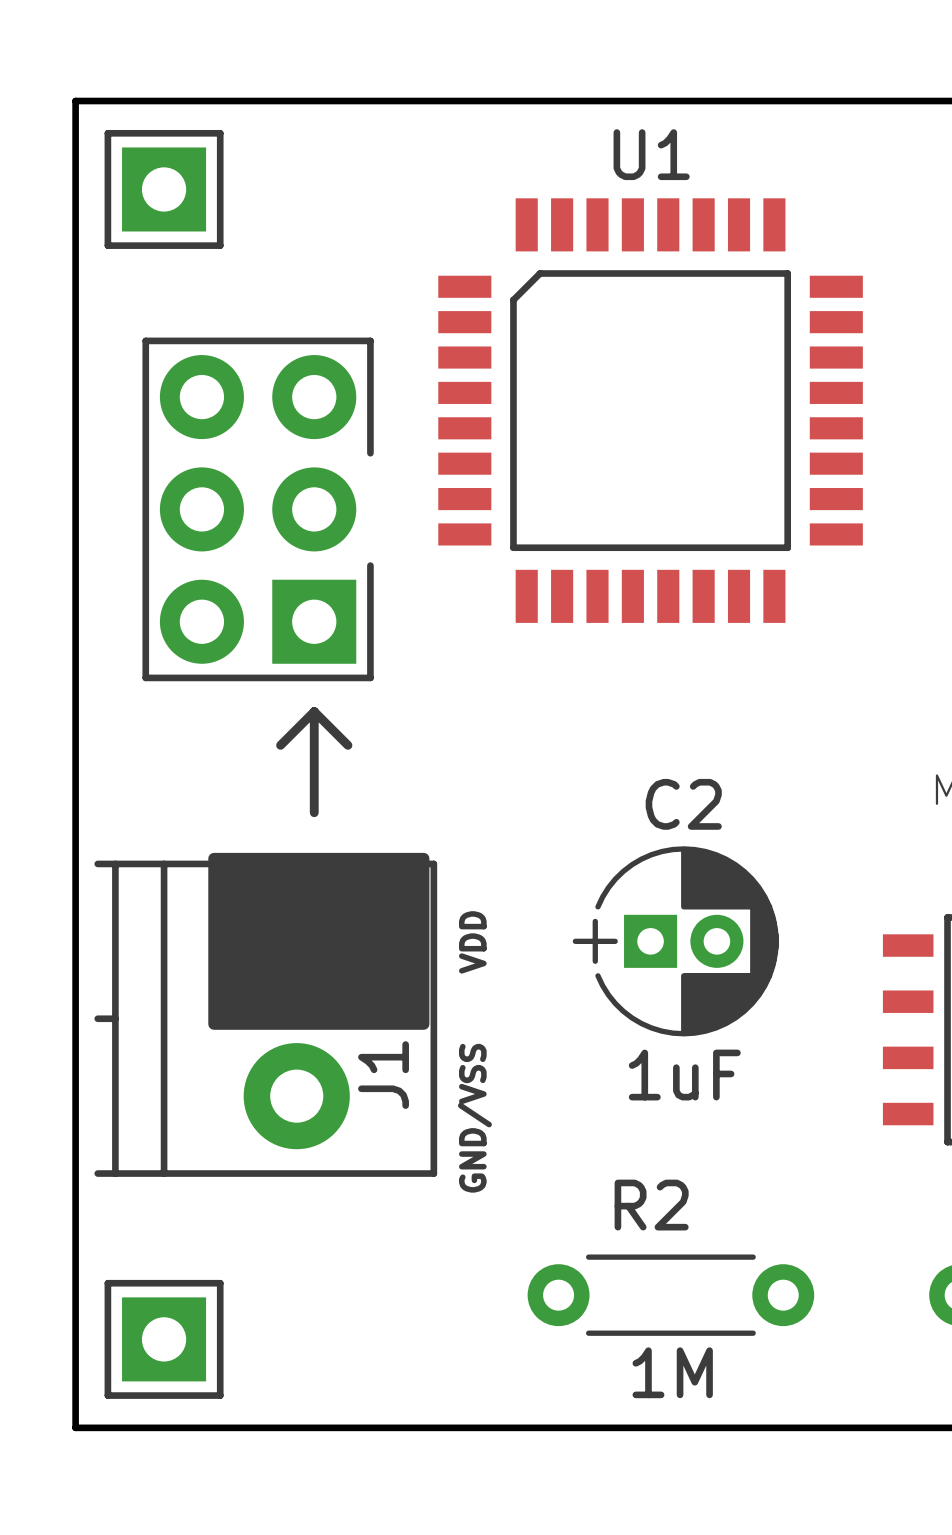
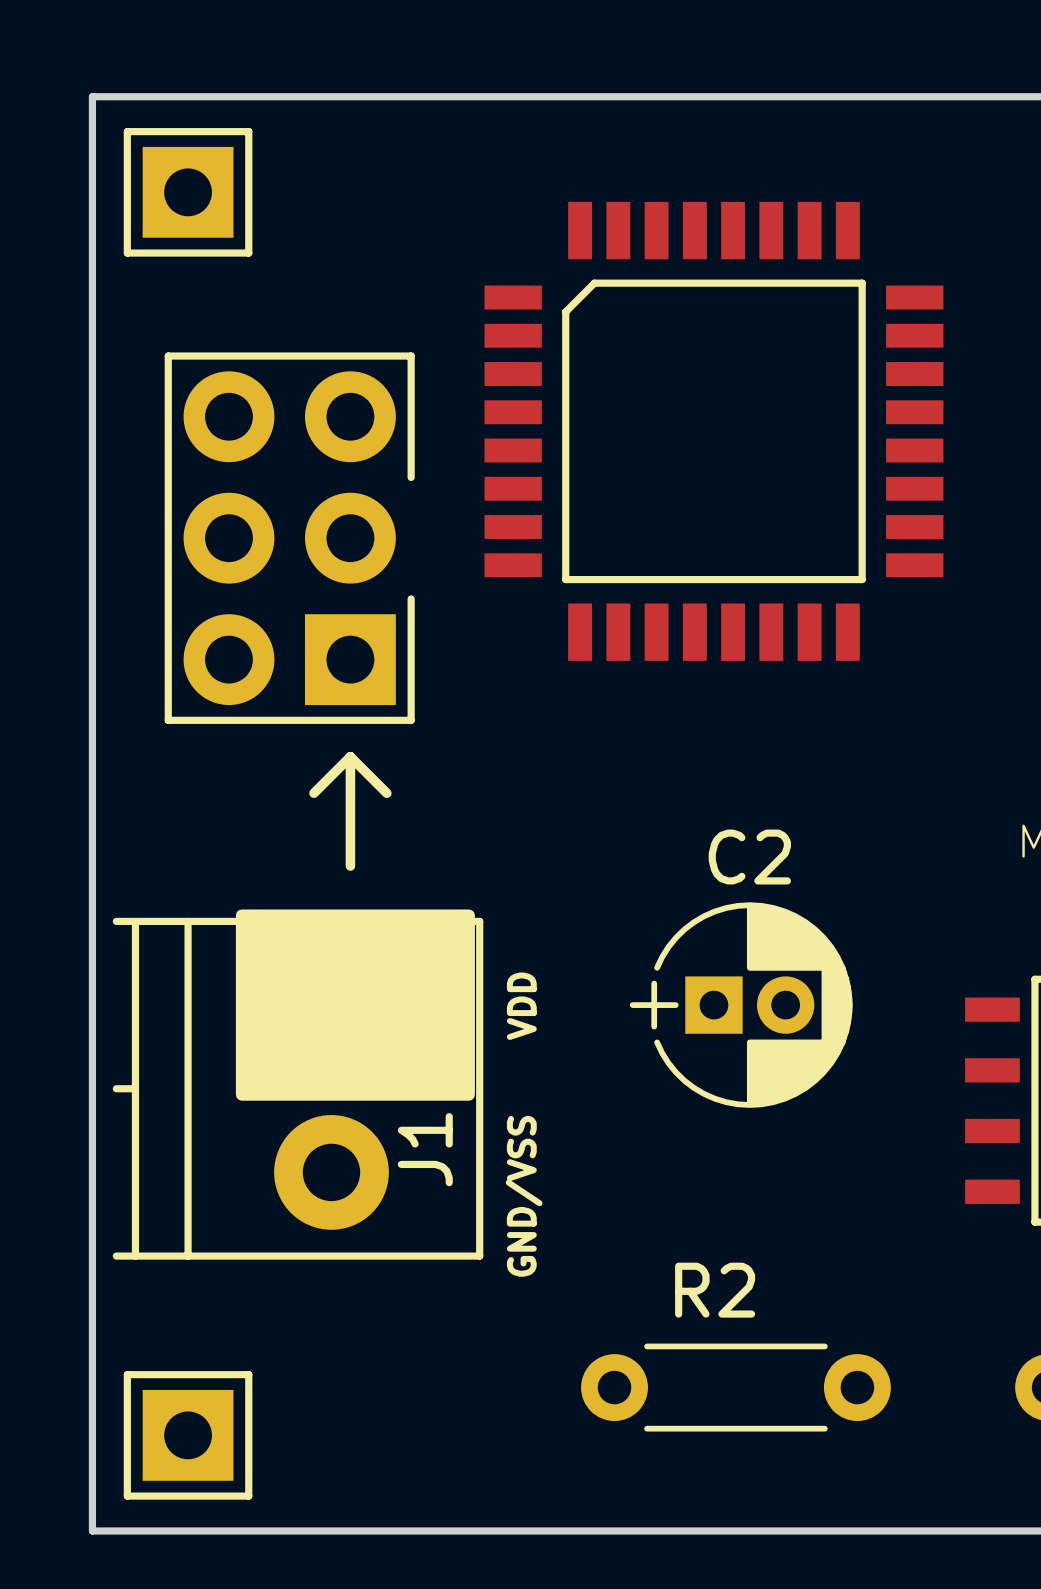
U1 name: U1 (651, 154) -> none
C2 value: 1uF (684, 1075) -> none
R2 value: 1M (672, 1372) -> none

